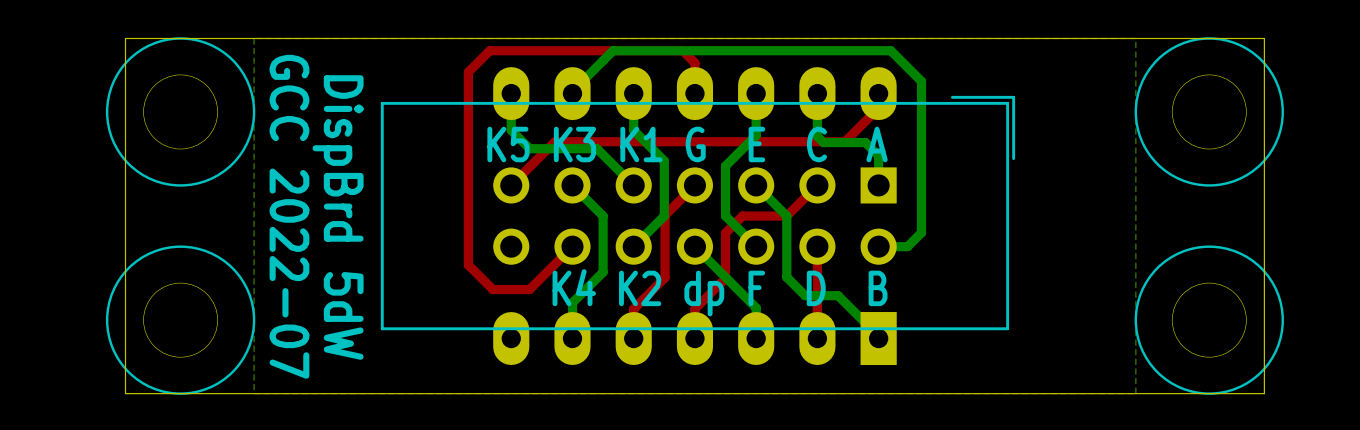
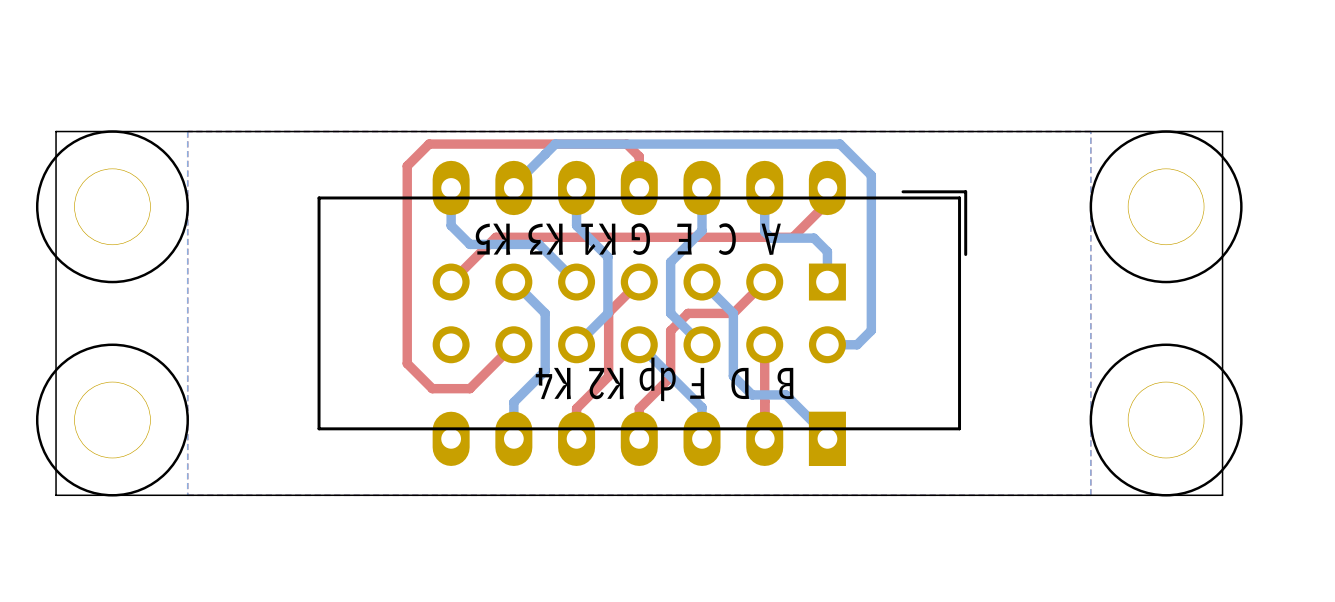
text: K5 K3 K1 G E C A (687, 144) -> A C E G K1 K3 K5 (628, 239)
text: GCC 2022-07 (289, 216) -> none
text: DispBrd 5dW (338, 217) -> none
text: K4 K2 dp F D B (720, 292) -> B D F dp K2 K4 (664, 379)

